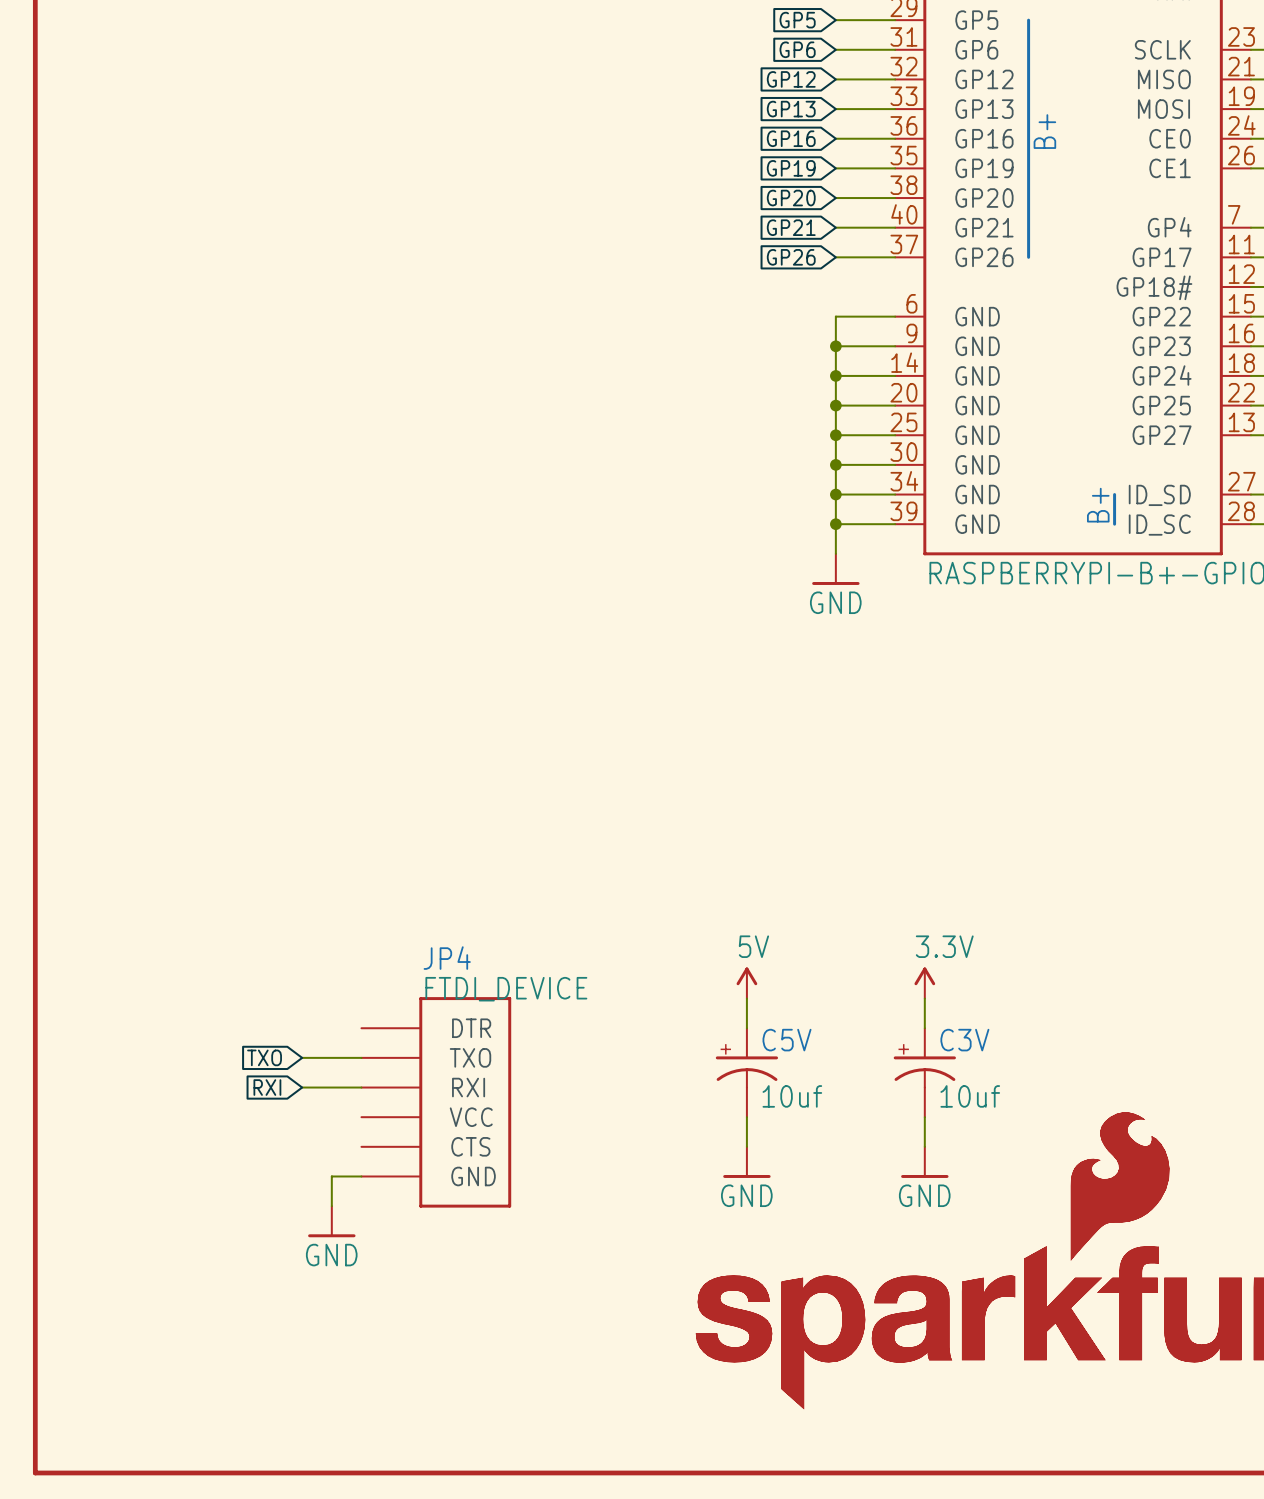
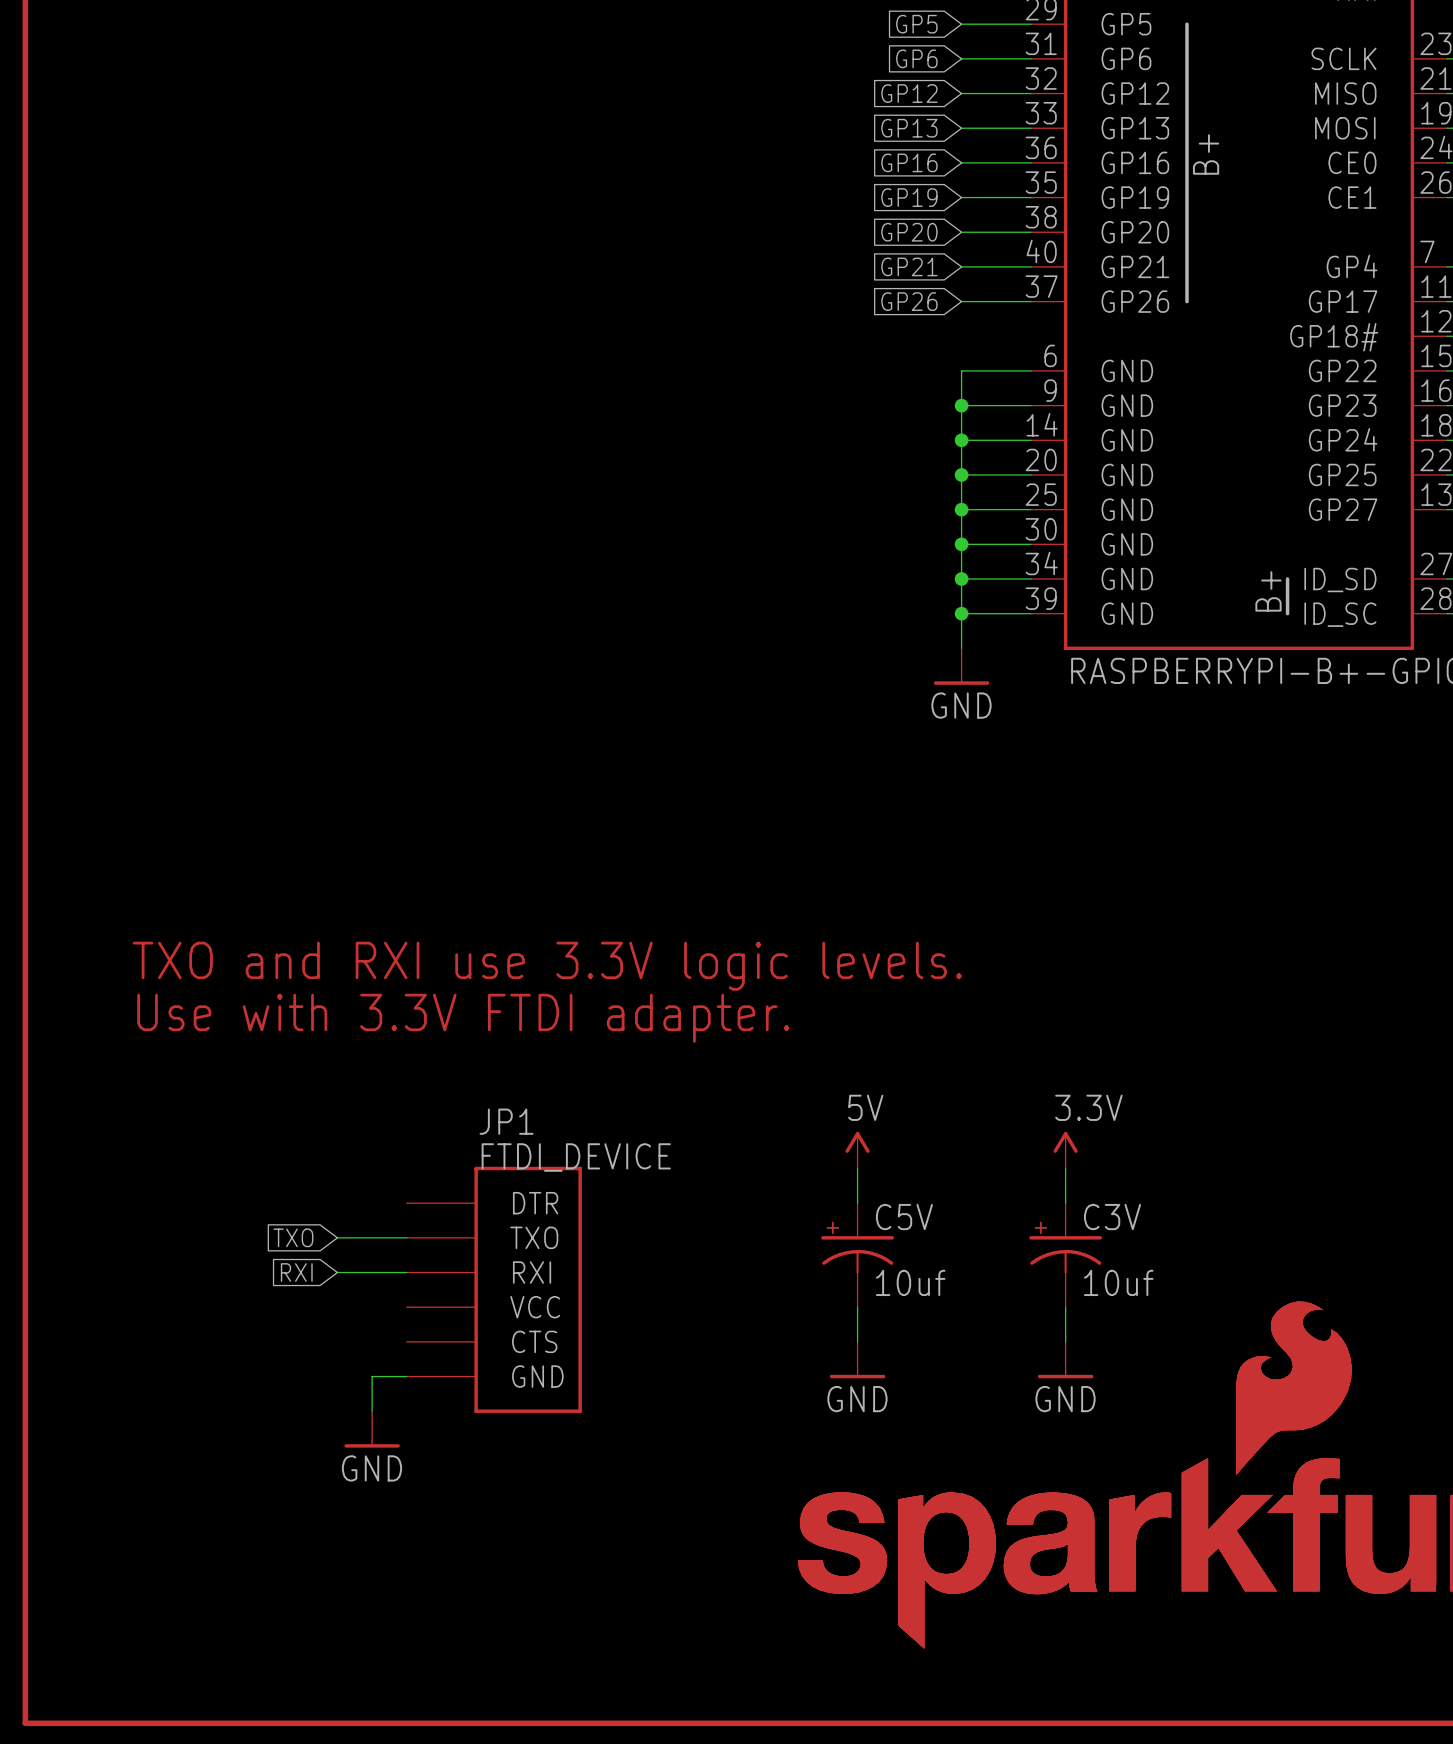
text: none -> TXO and RXI use 3.3V logic levels. (547, 966)
text: none -> Use with 3.3V FTDI adapter. (463, 1018)
JP4 name: JP4 (447, 958) -> JP1 (506, 1121)

